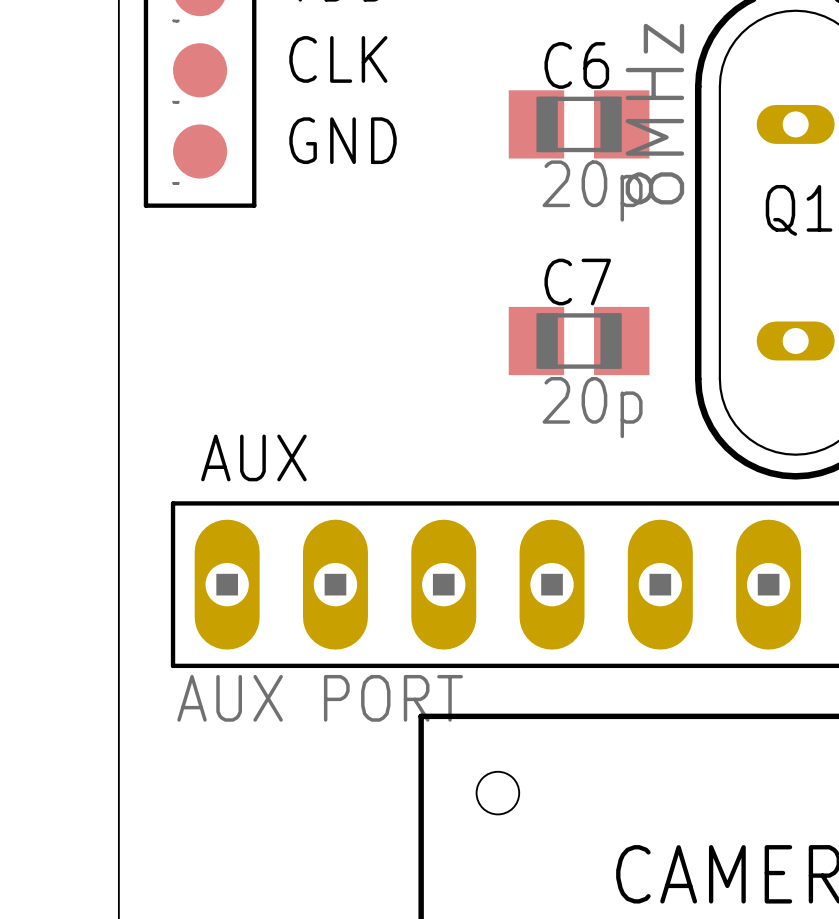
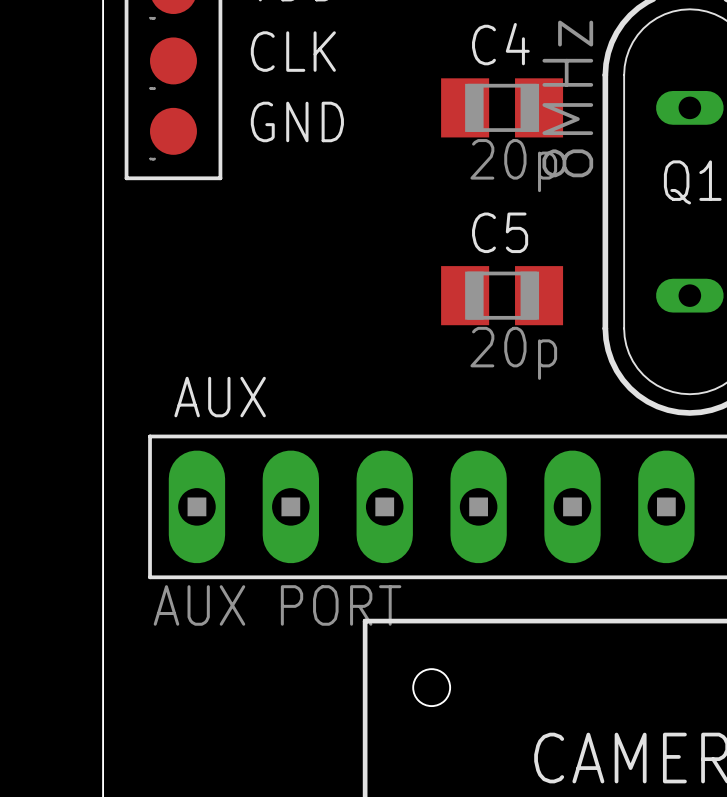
C6 name: C6 (576, 65) -> C4 (500, 44)
C7 name: C7 (577, 282) -> C5 (500, 232)

